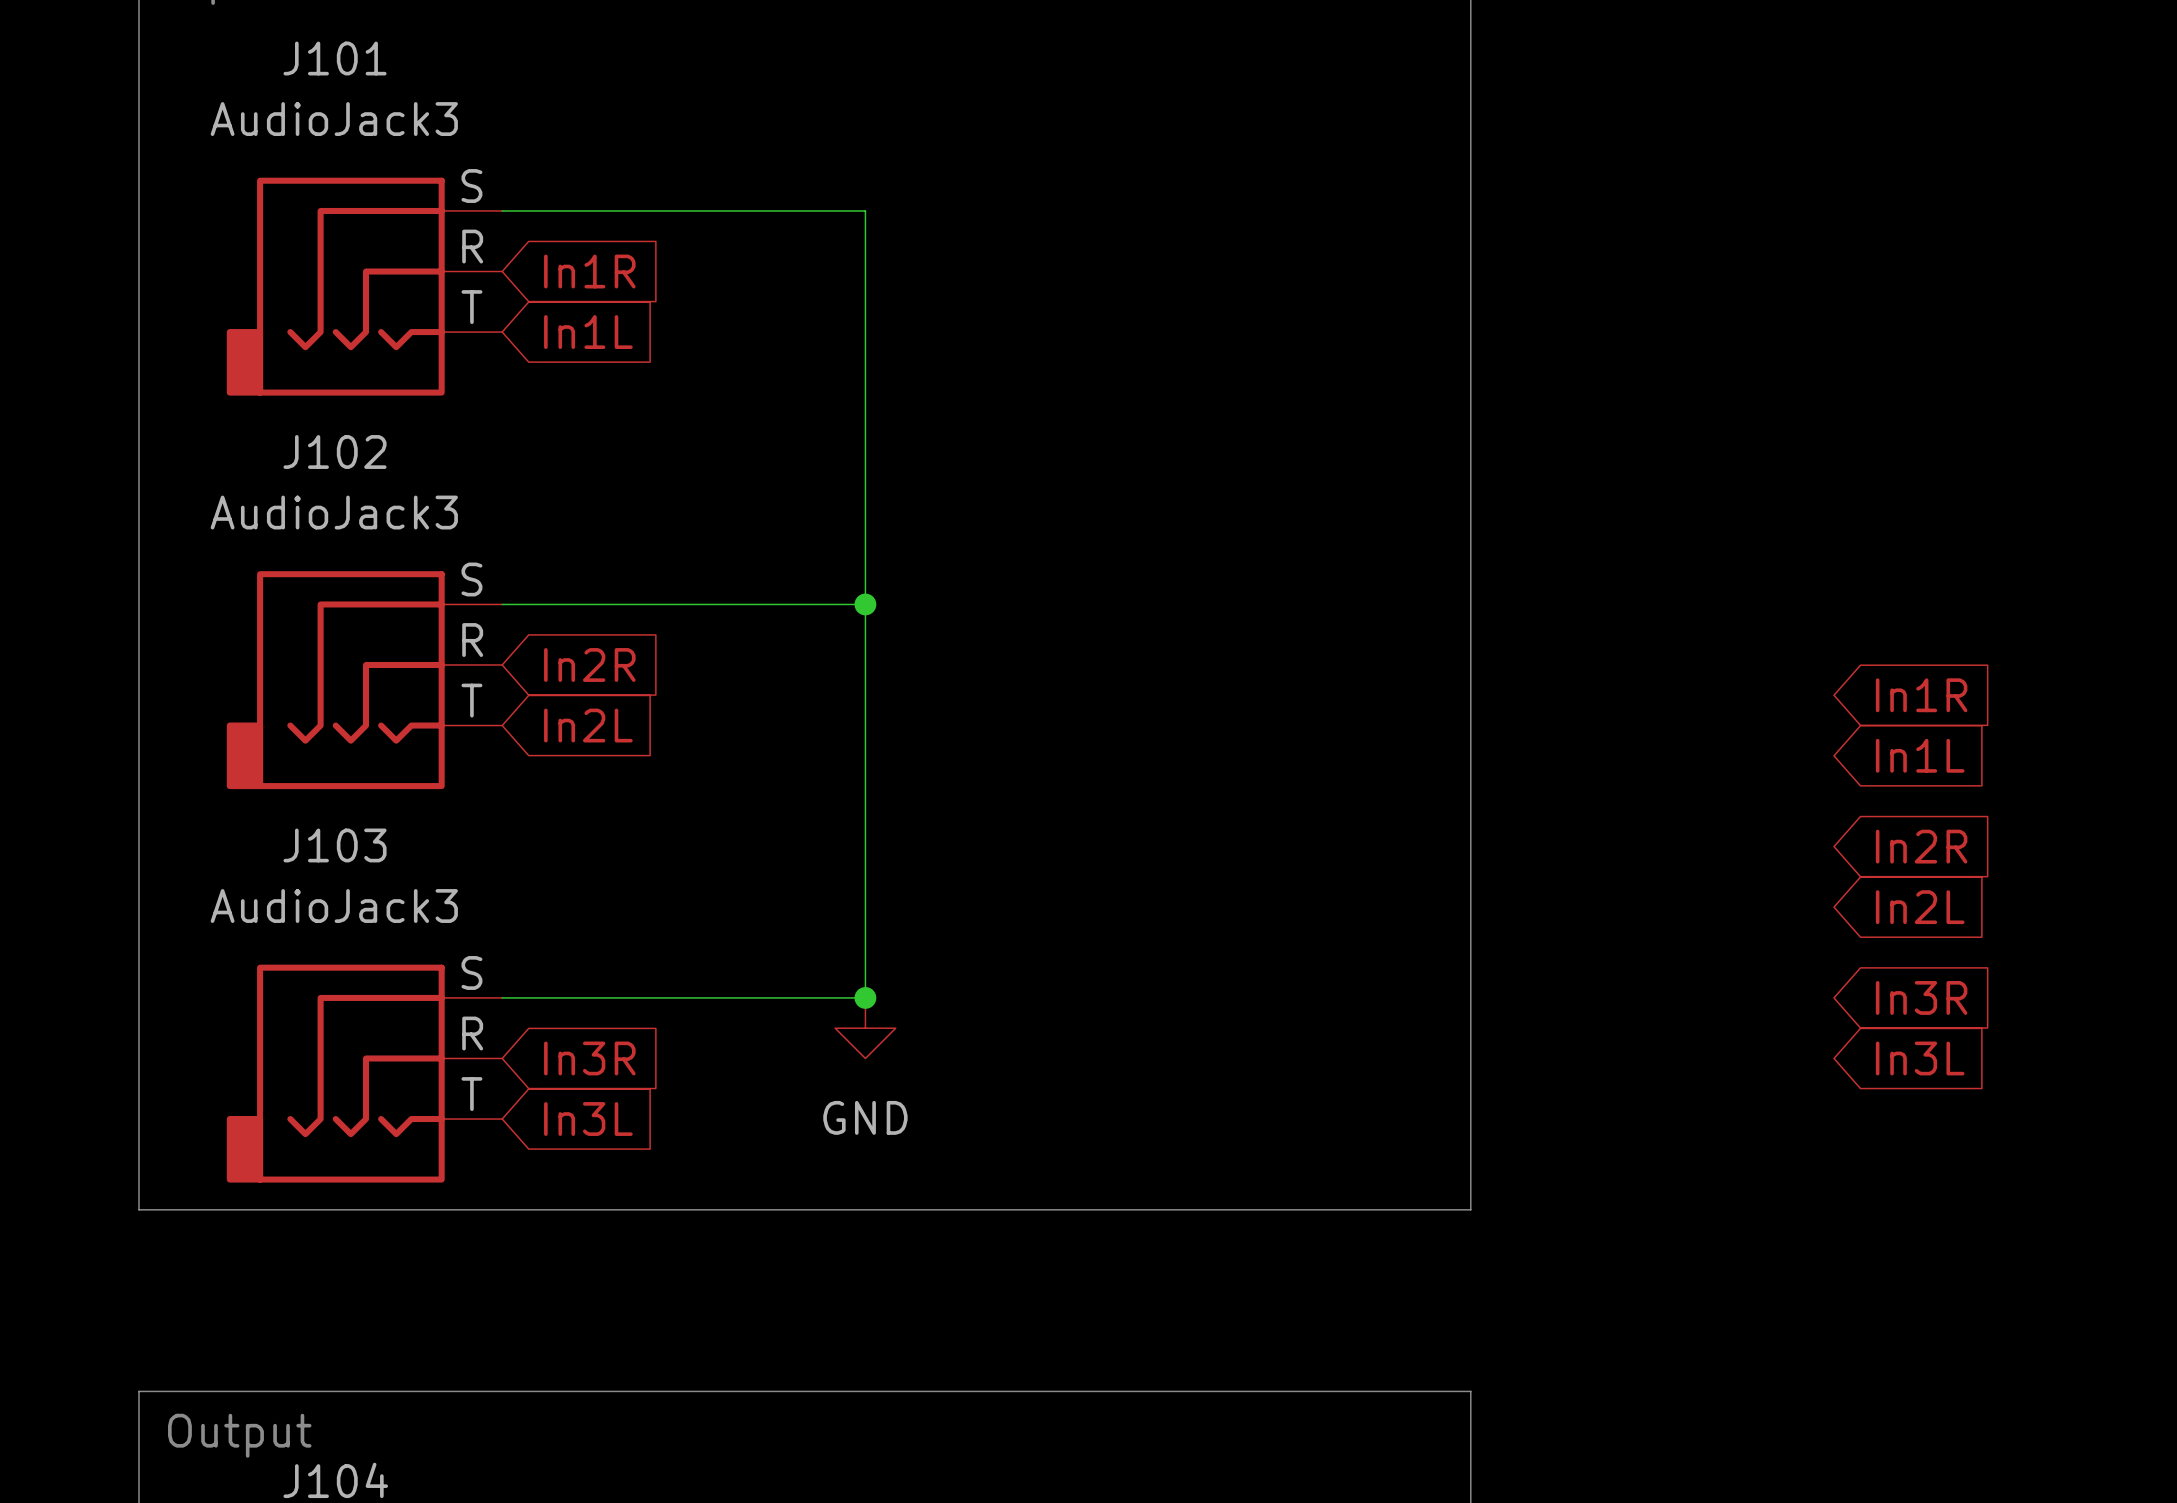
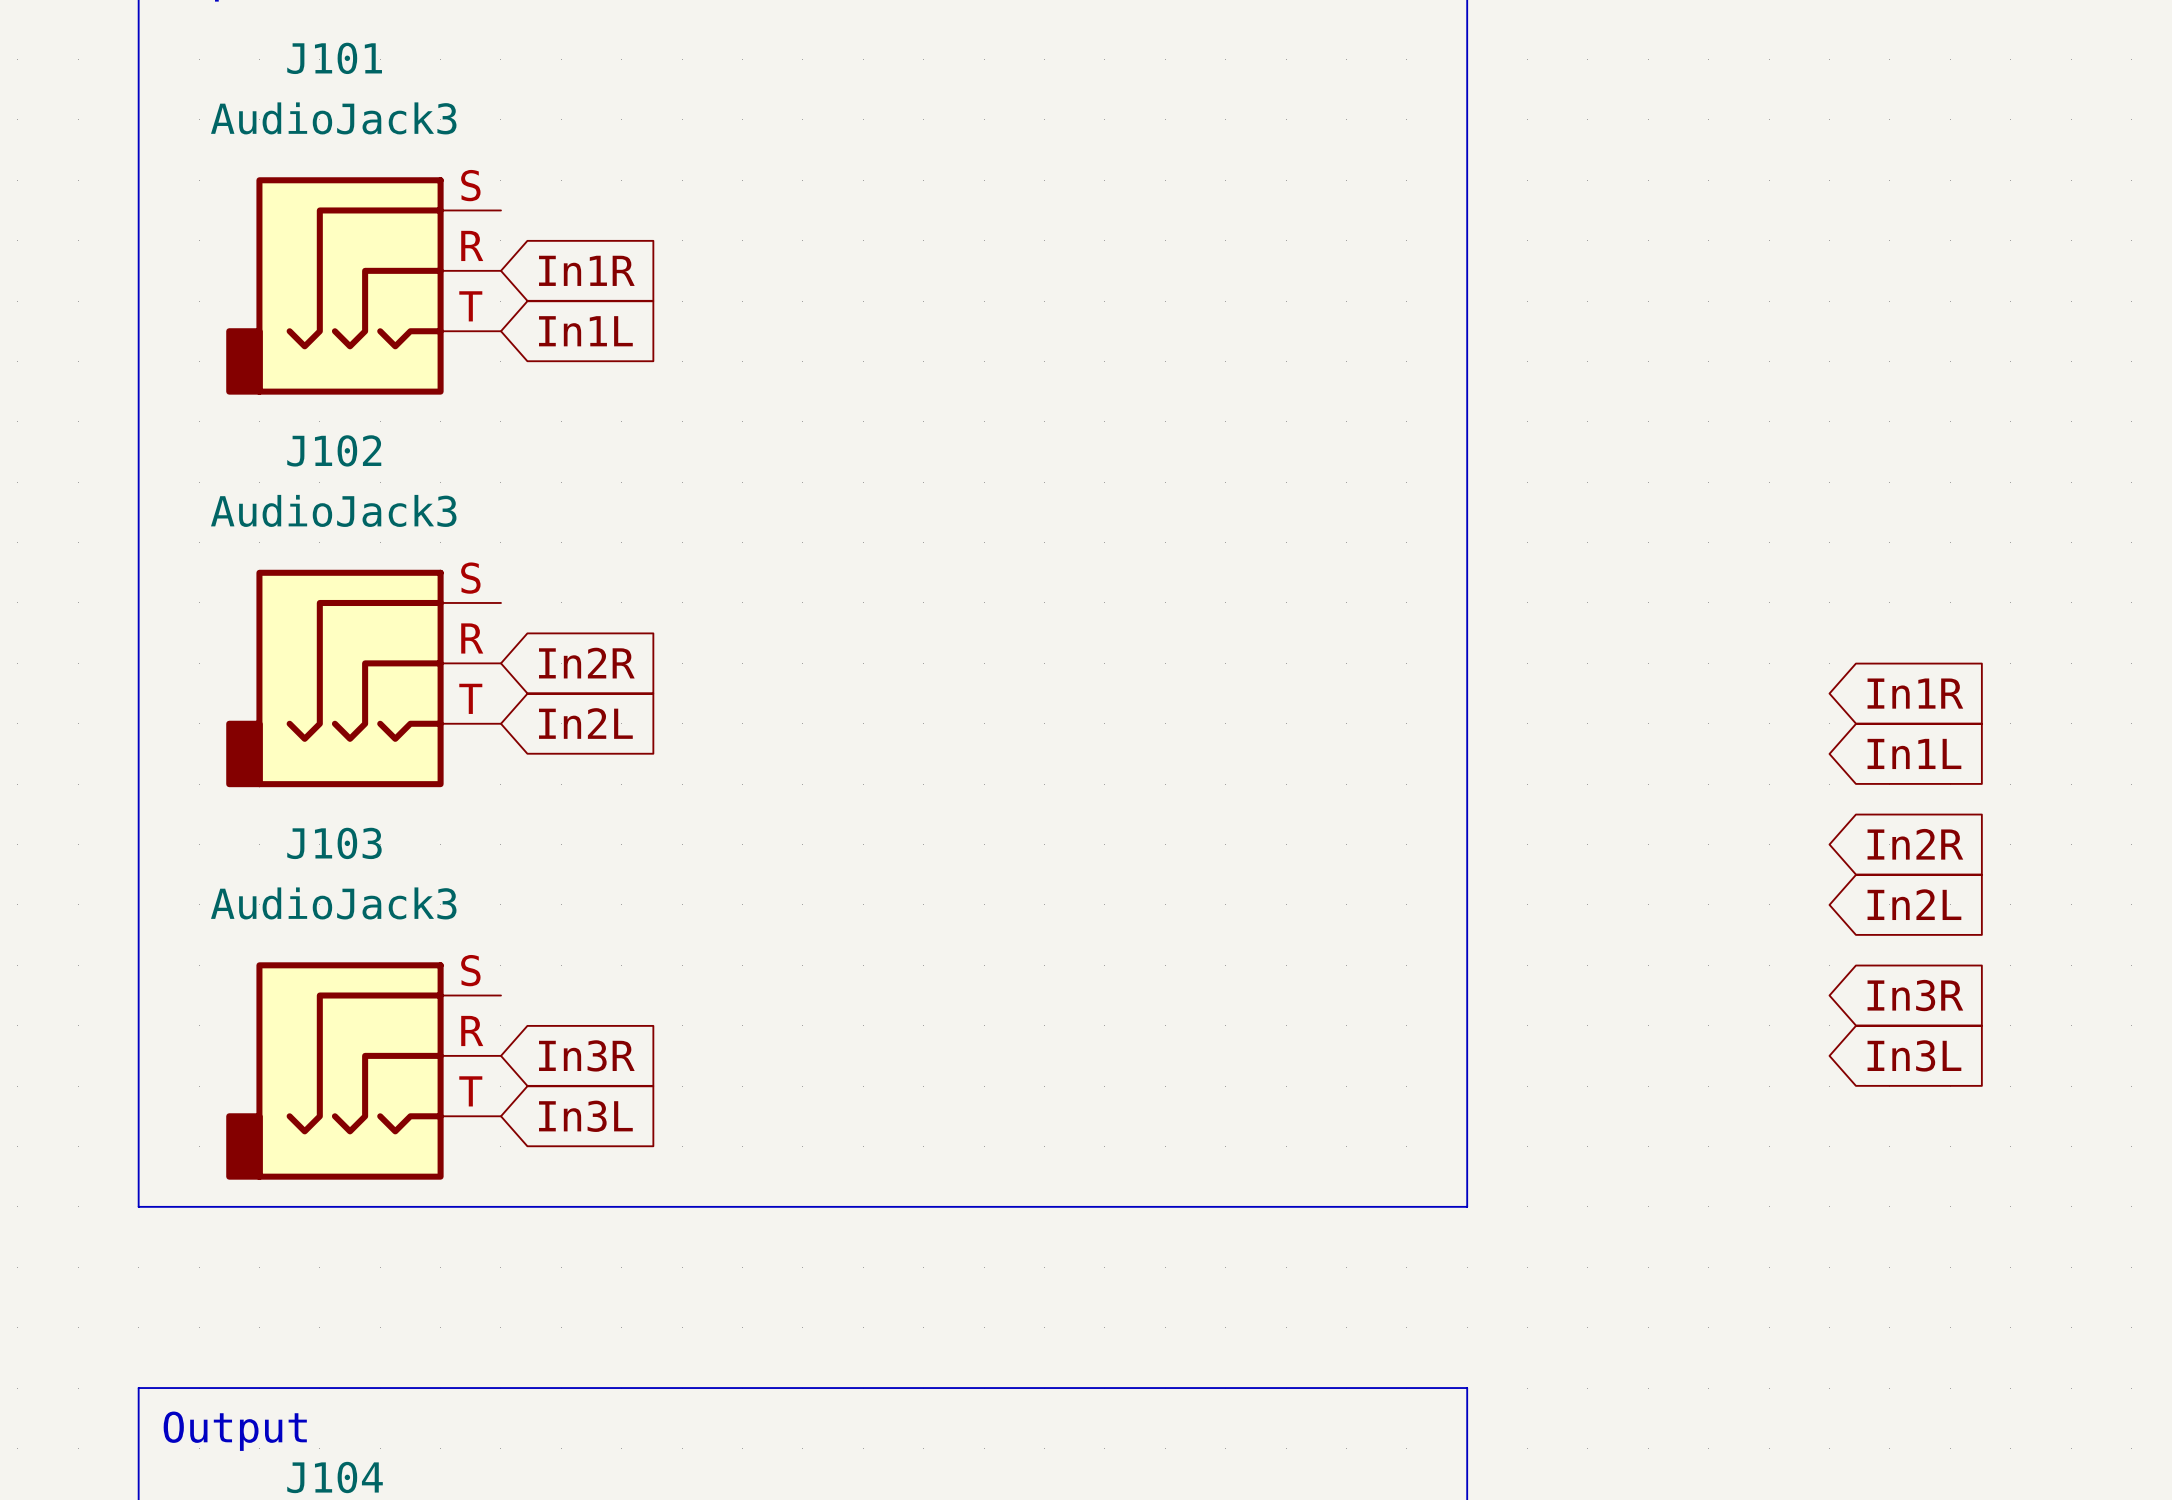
wire: (502, 210) (865, 210) (865, 997) (502, 997) -> none
wire: (502, 604) (865, 604) -> none
junction: (865, 604) -> none
junction: (865, 997) -> none
power symbol: GND (865, 1028) -> none

